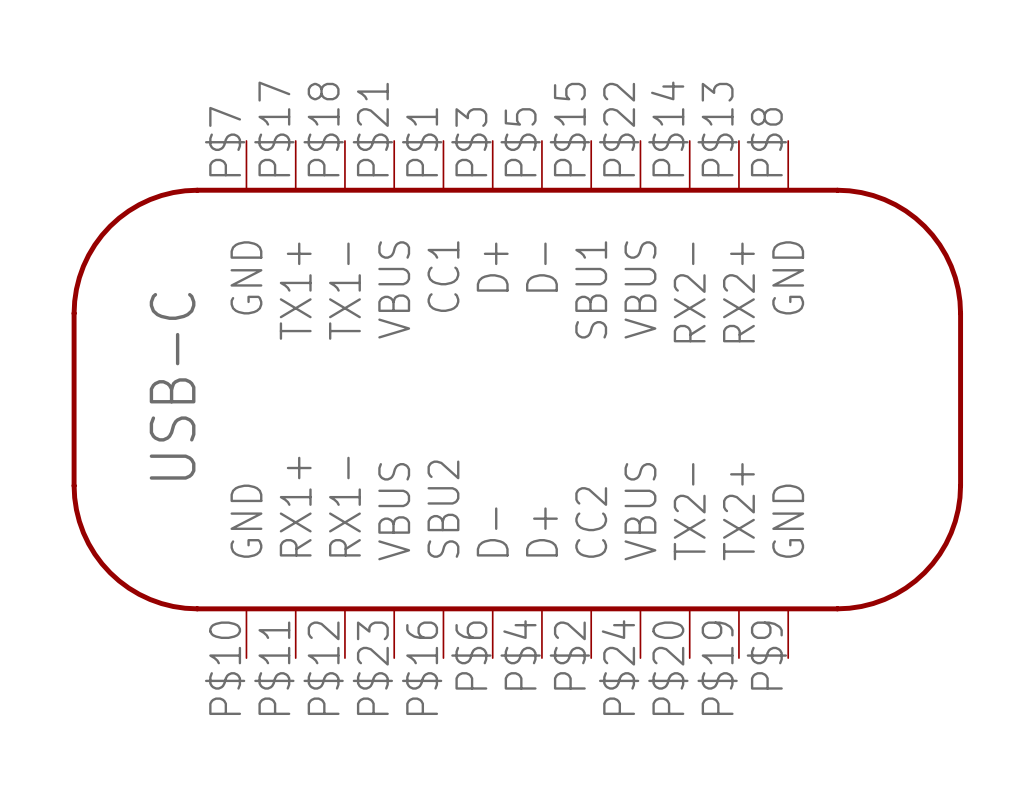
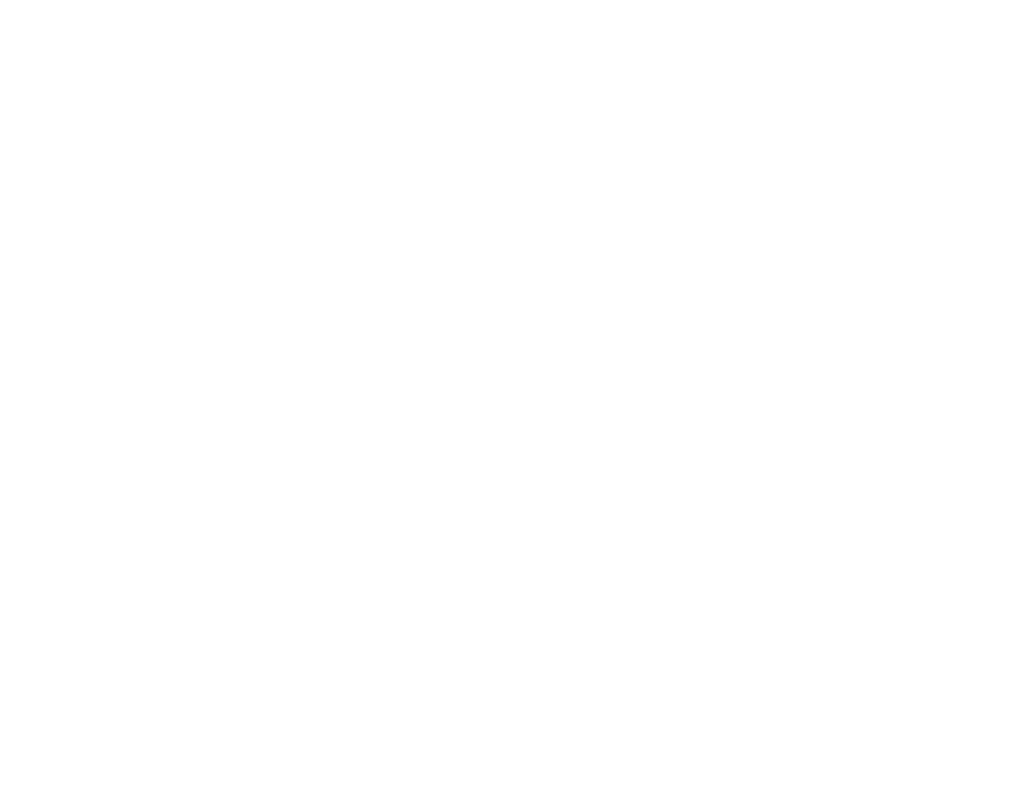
part: (517, 399) -> none

